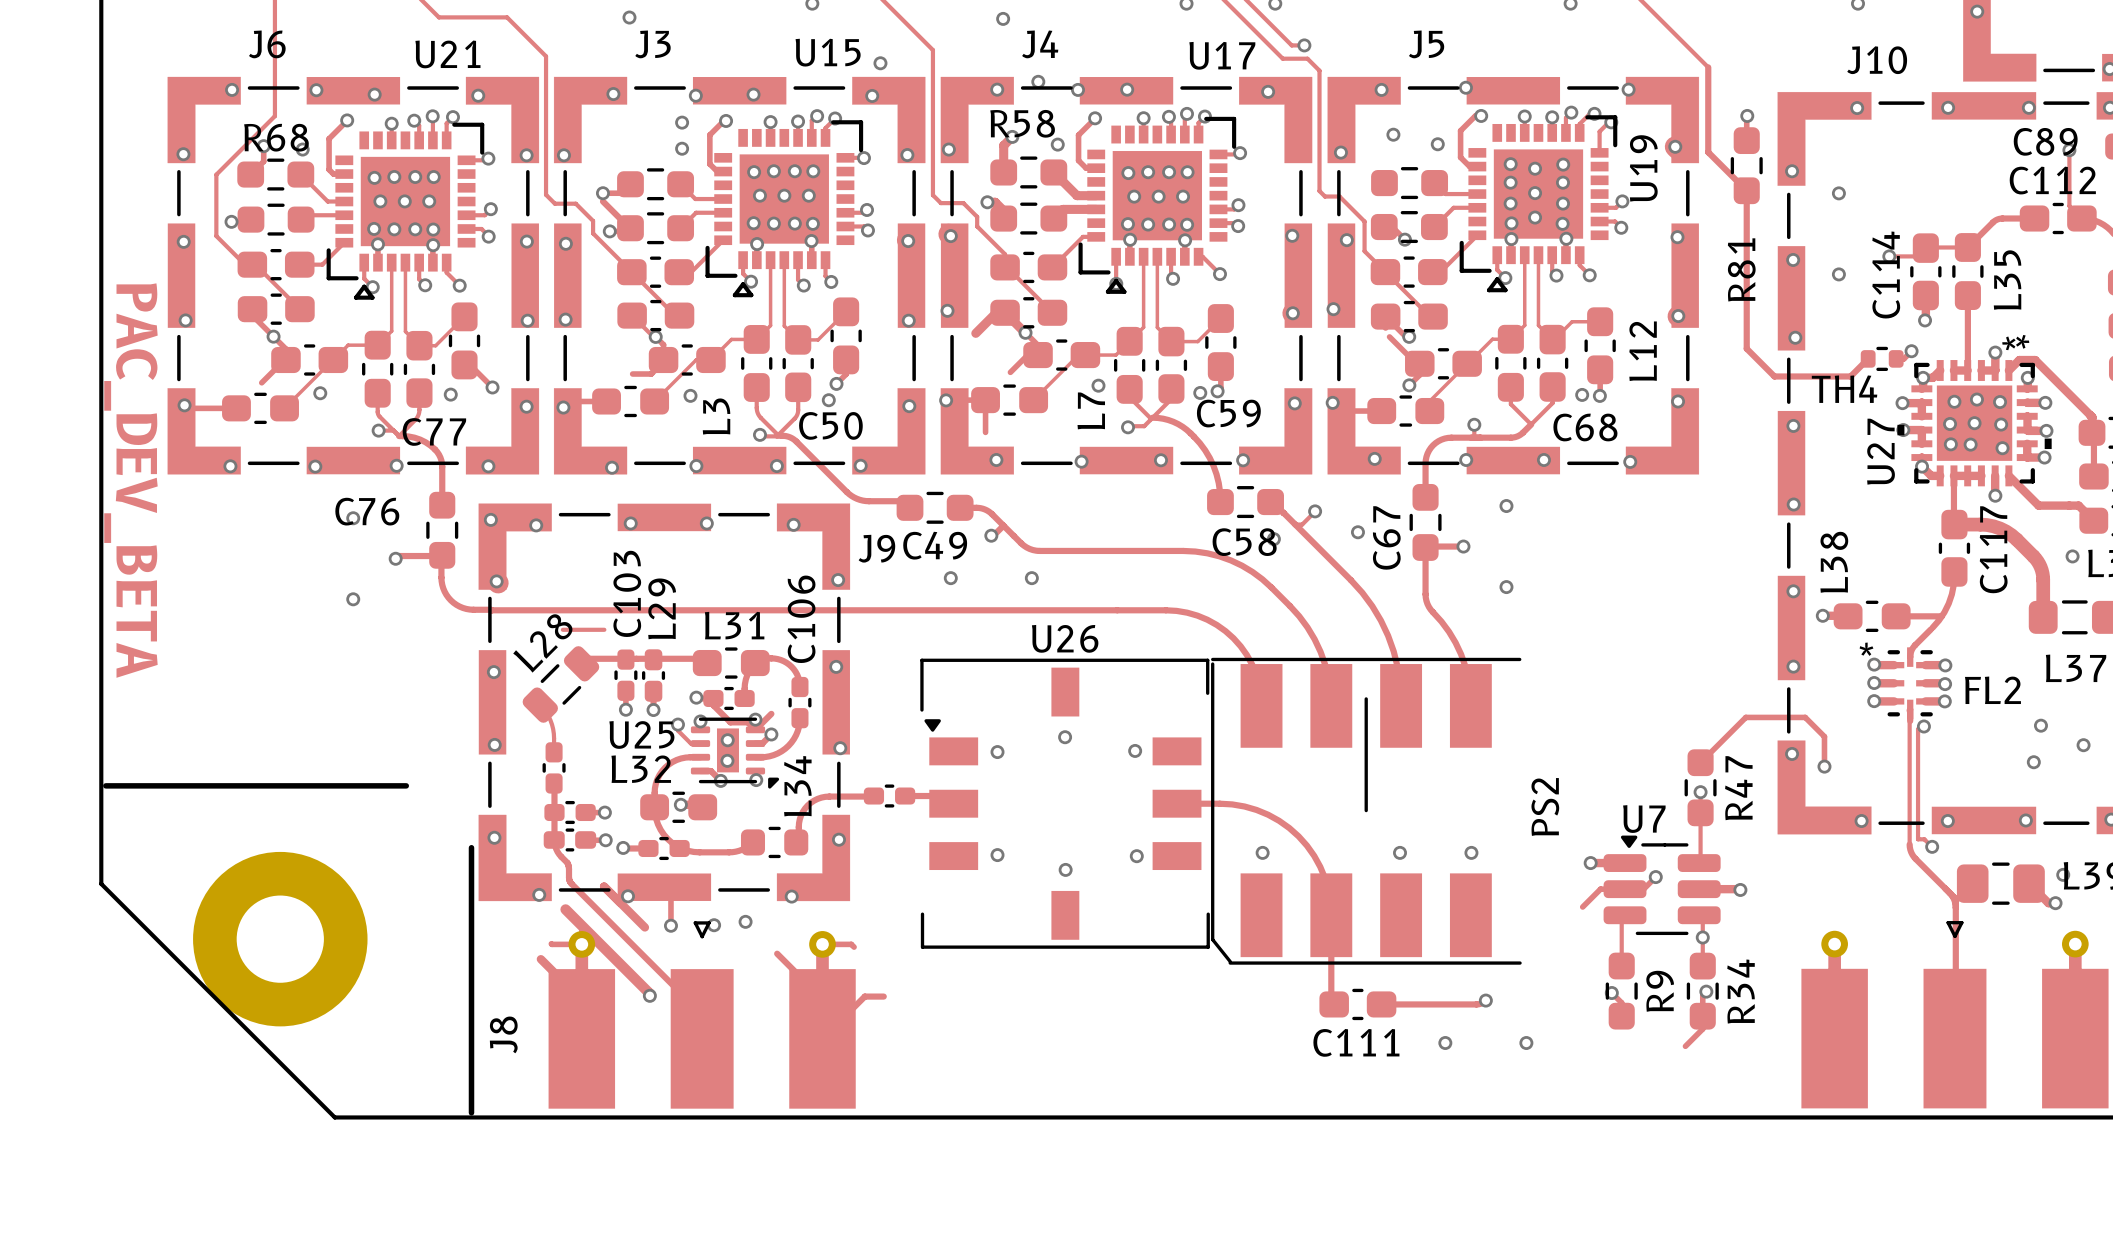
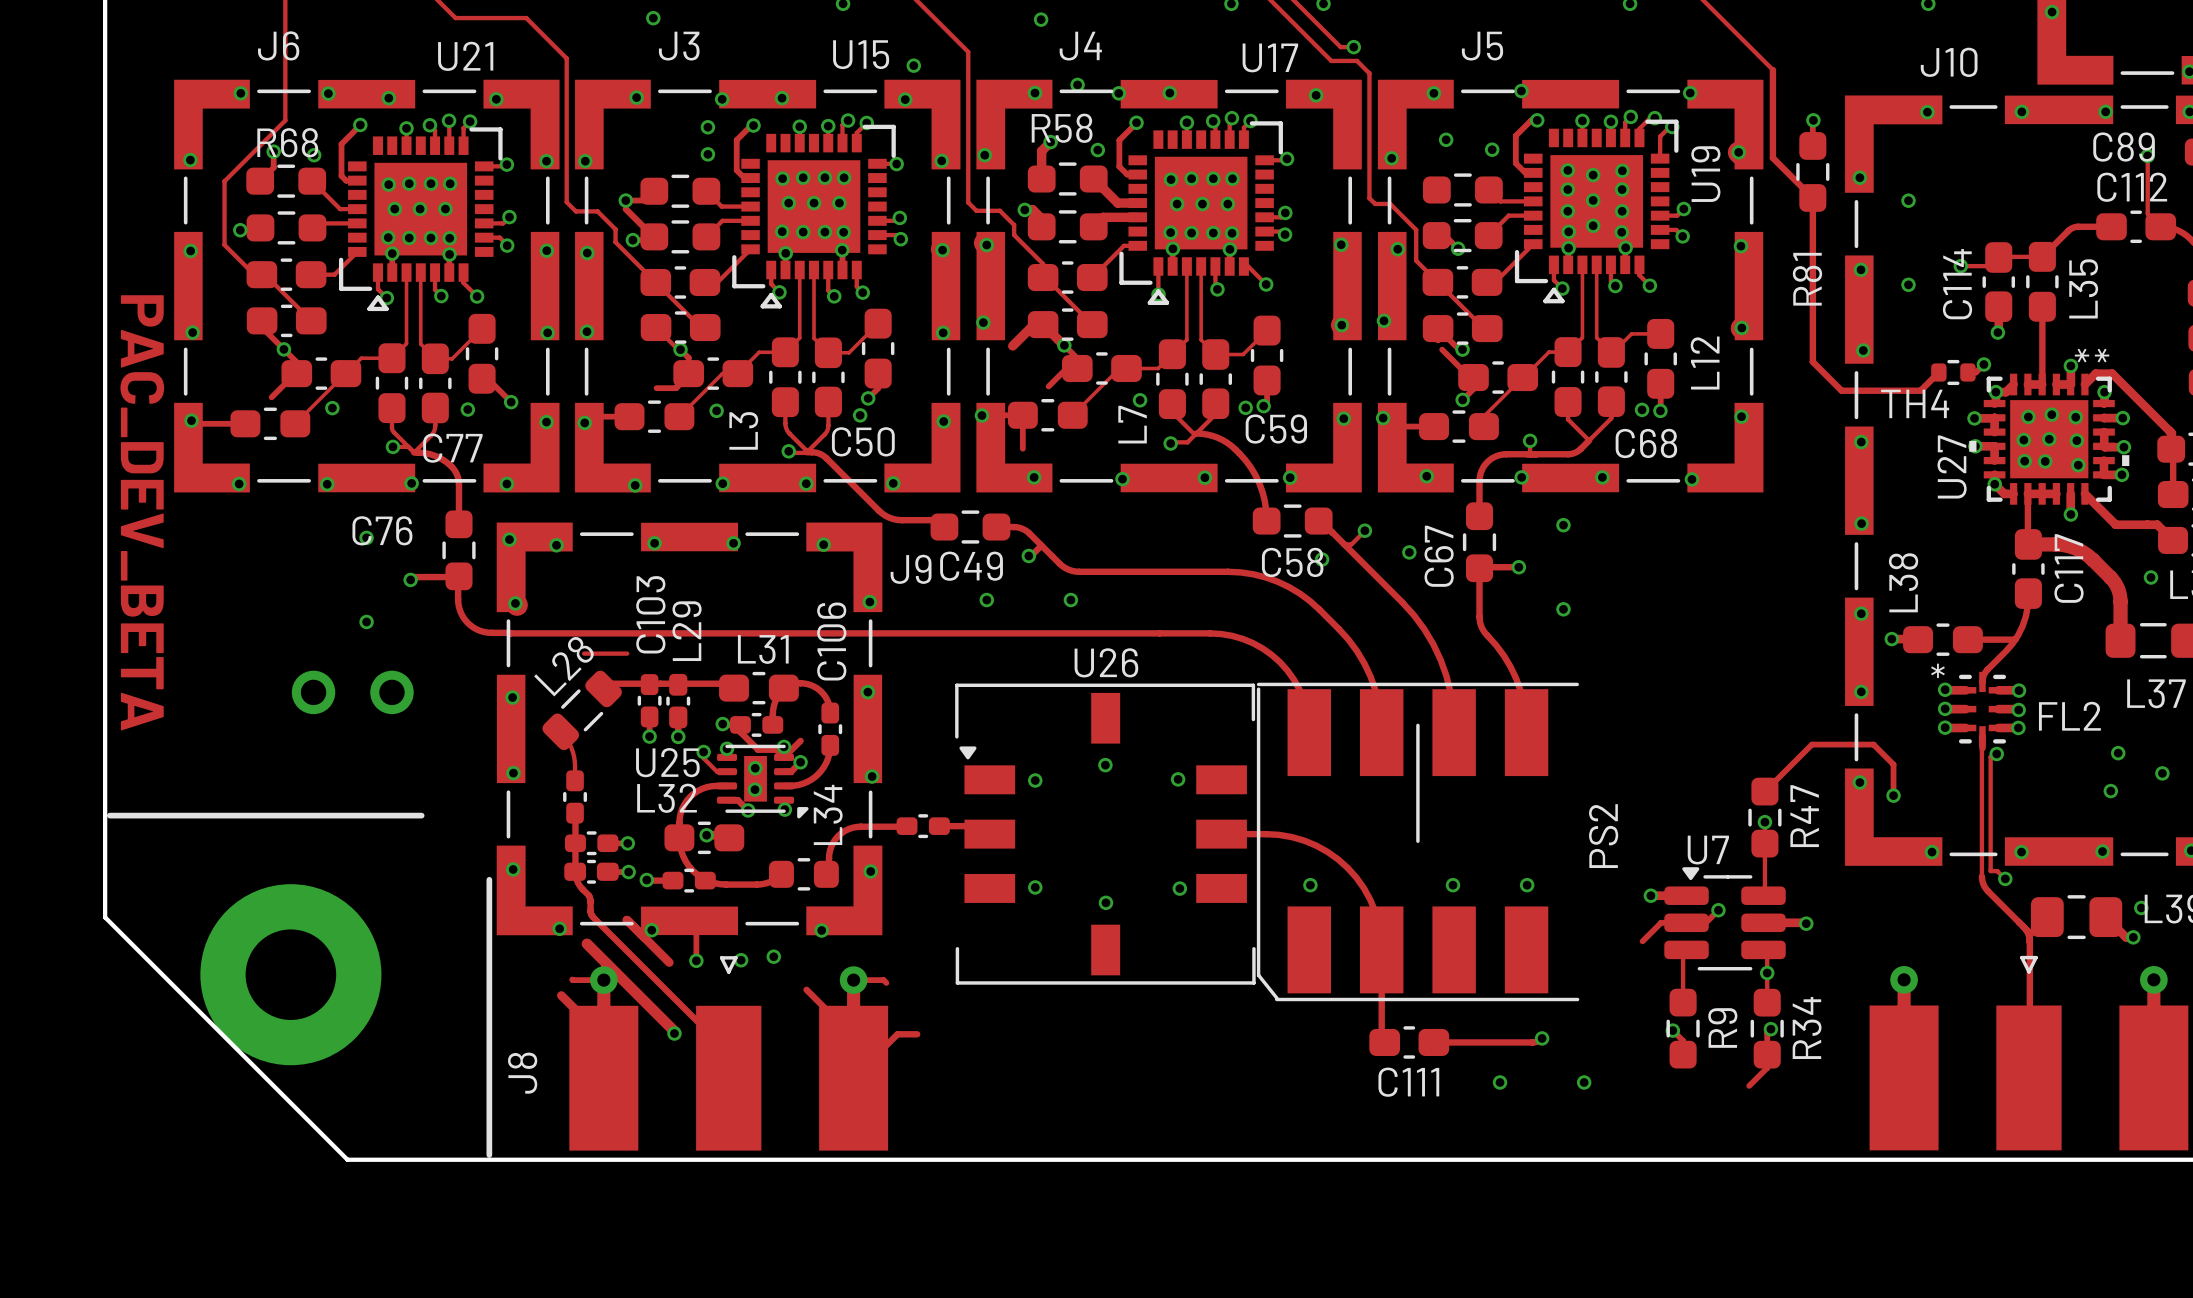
part: none -> (313, 692)
part: none -> (391, 692)

